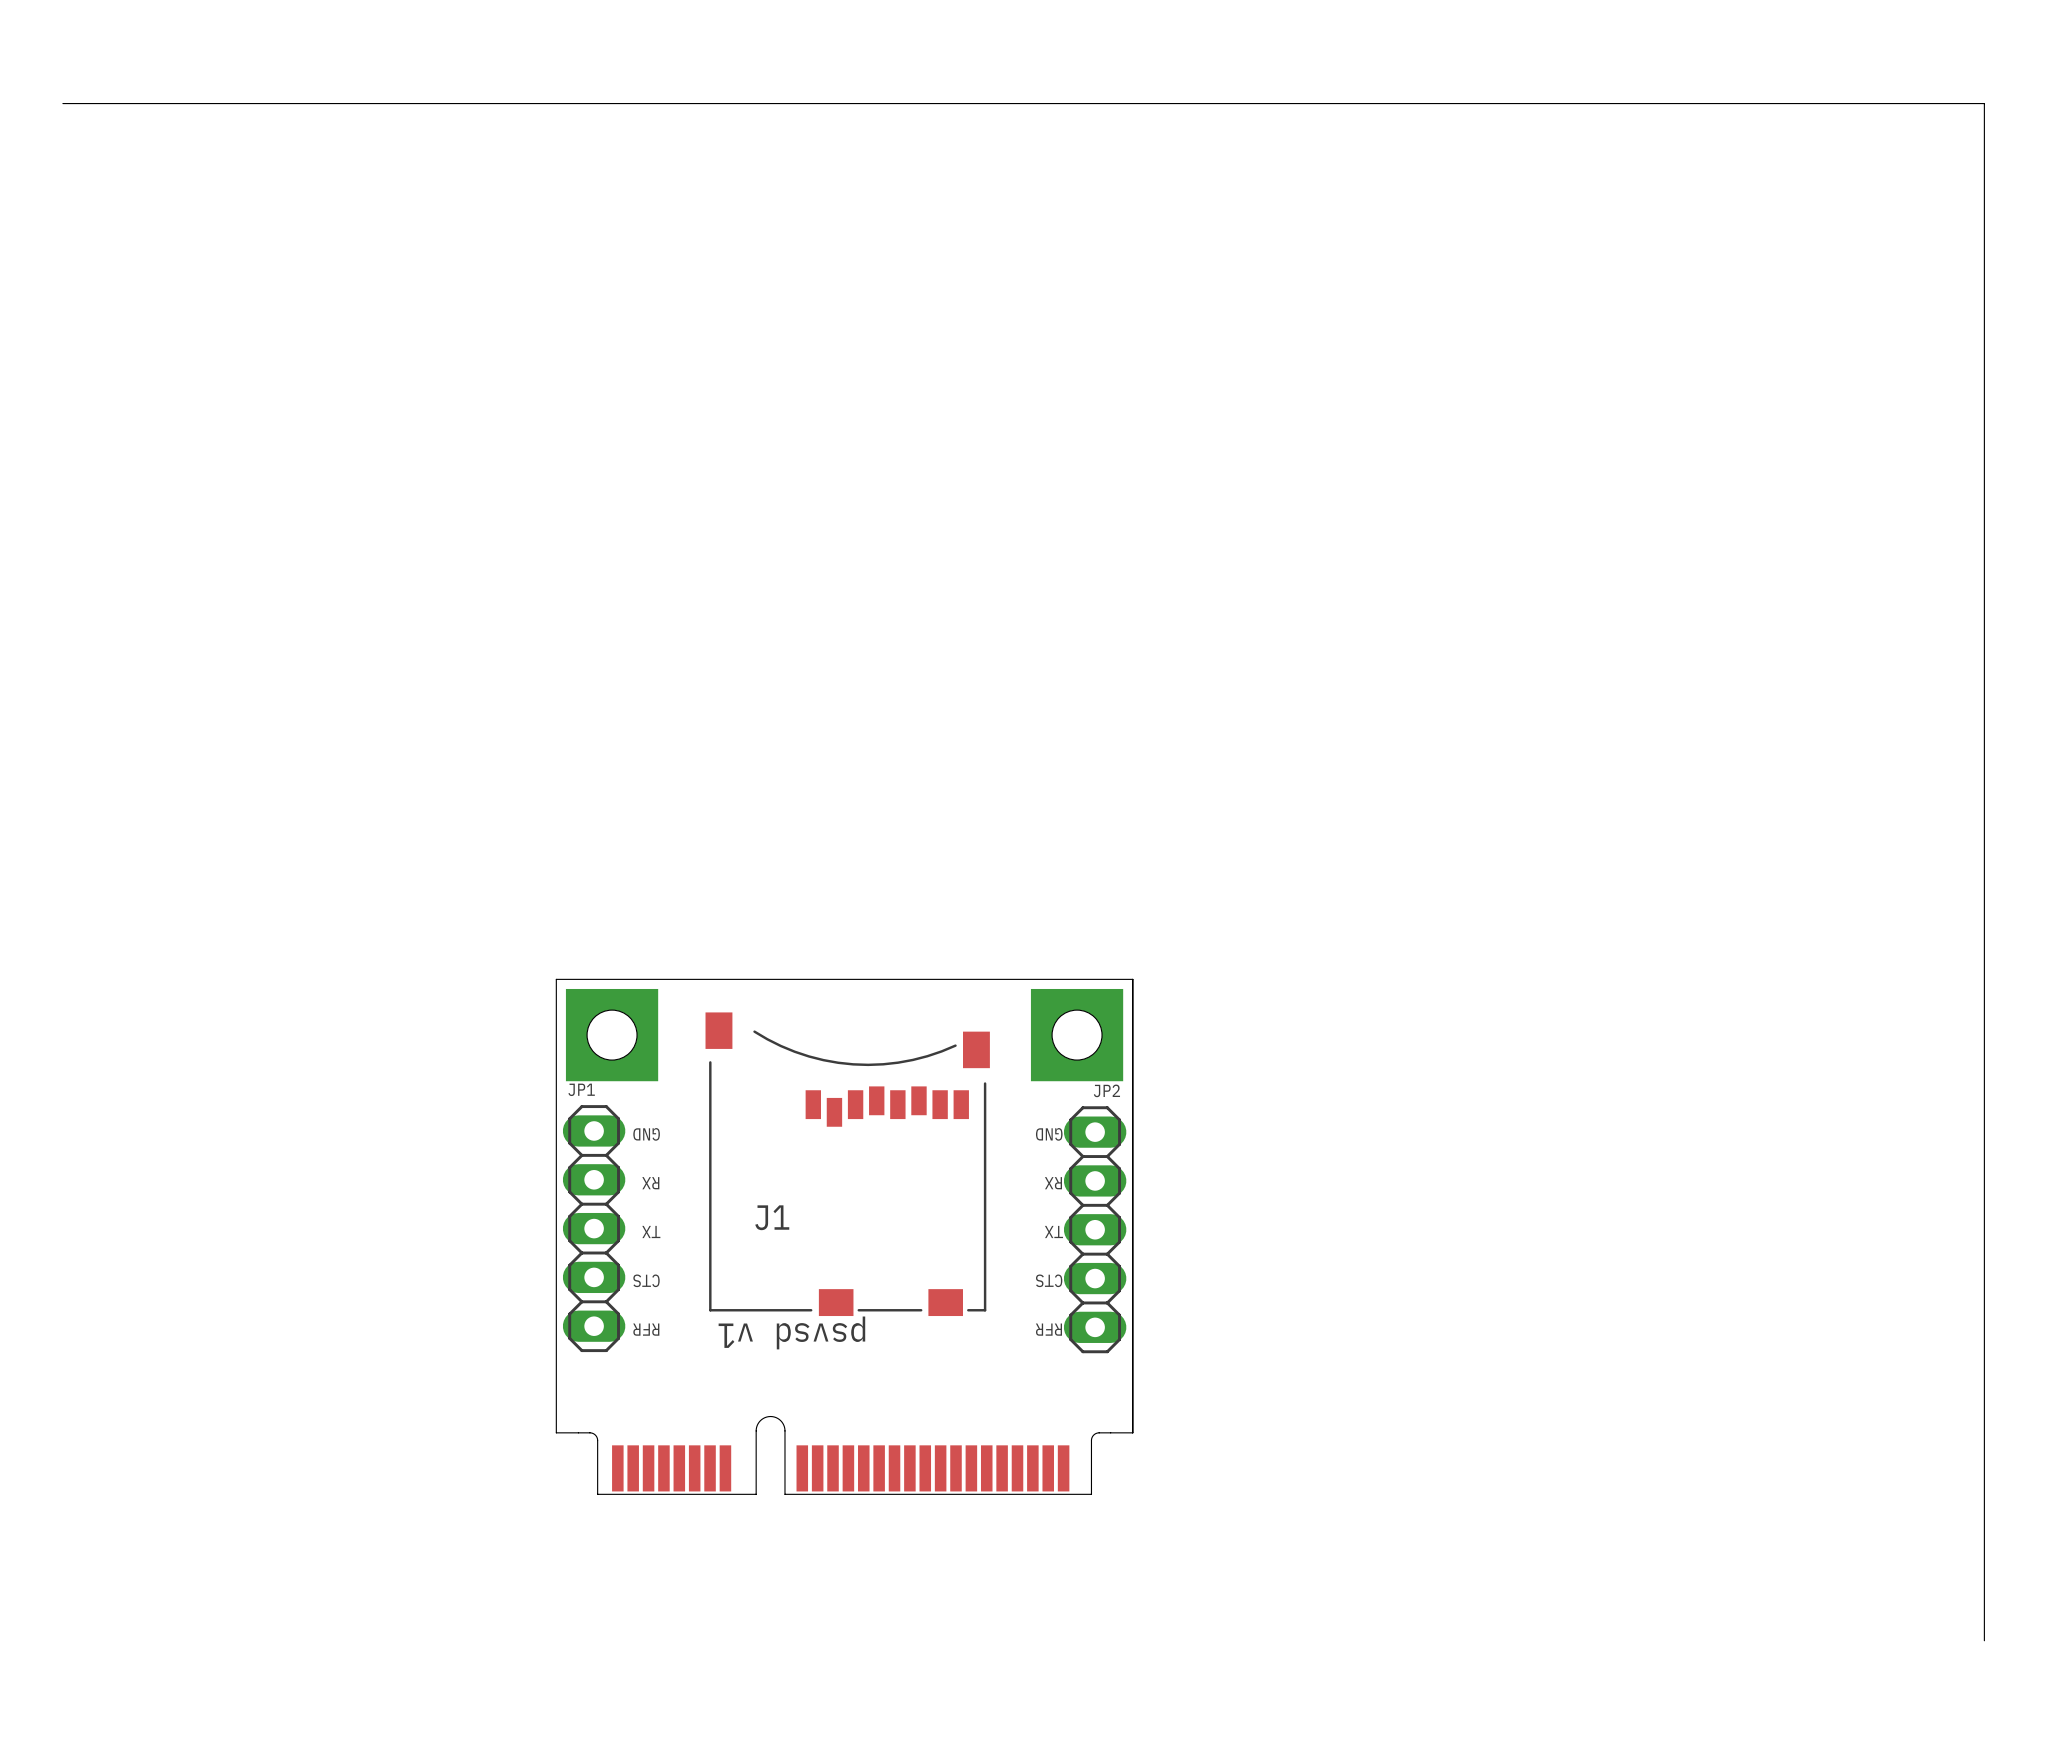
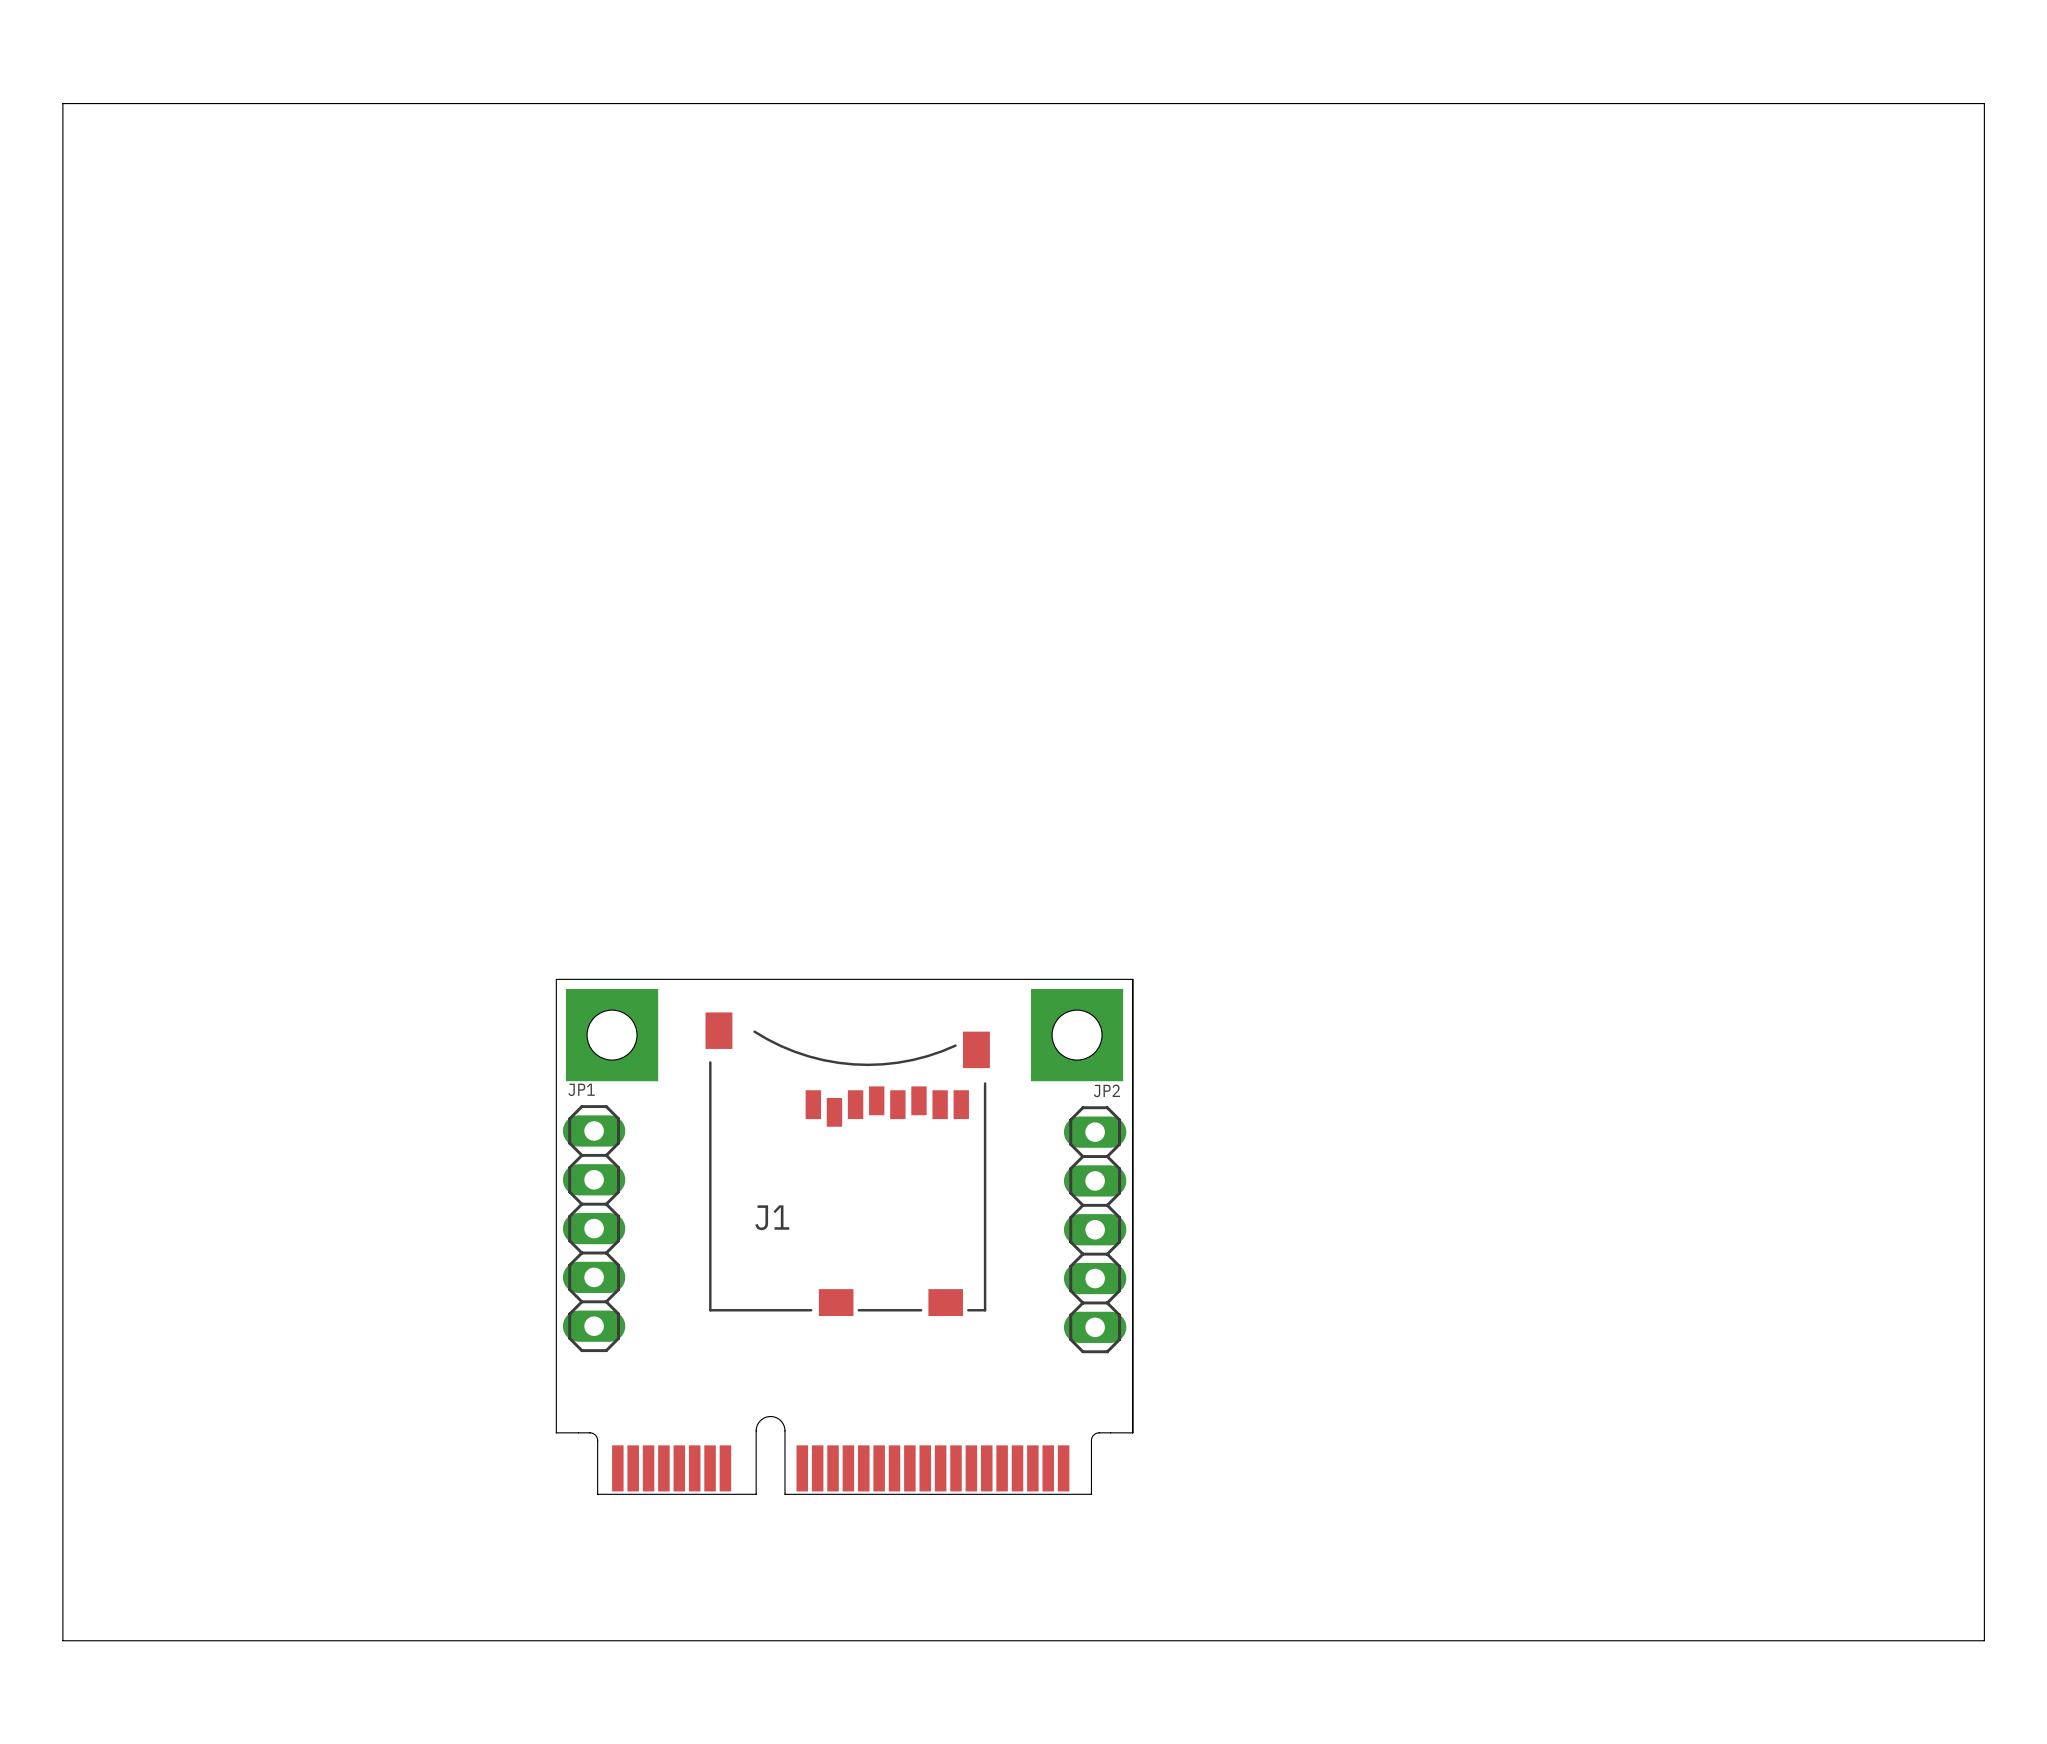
board edge: none -> (62, 103) (62, 1640) (1984, 1640)
text: GND (646, 1134) -> none
text: GND (1049, 1134) -> none
text: RX (650, 1183) -> none
text: RX (1053, 1183) -> none
text: TX (651, 1232) -> none
text: TX (1053, 1232) -> none
text: CTS (646, 1280) -> none
text: CTS (1049, 1280) -> none
text: RFR (646, 1329) -> none
text: RFR (1048, 1329) -> none
text: psvsd v1 (791, 1332) -> none

